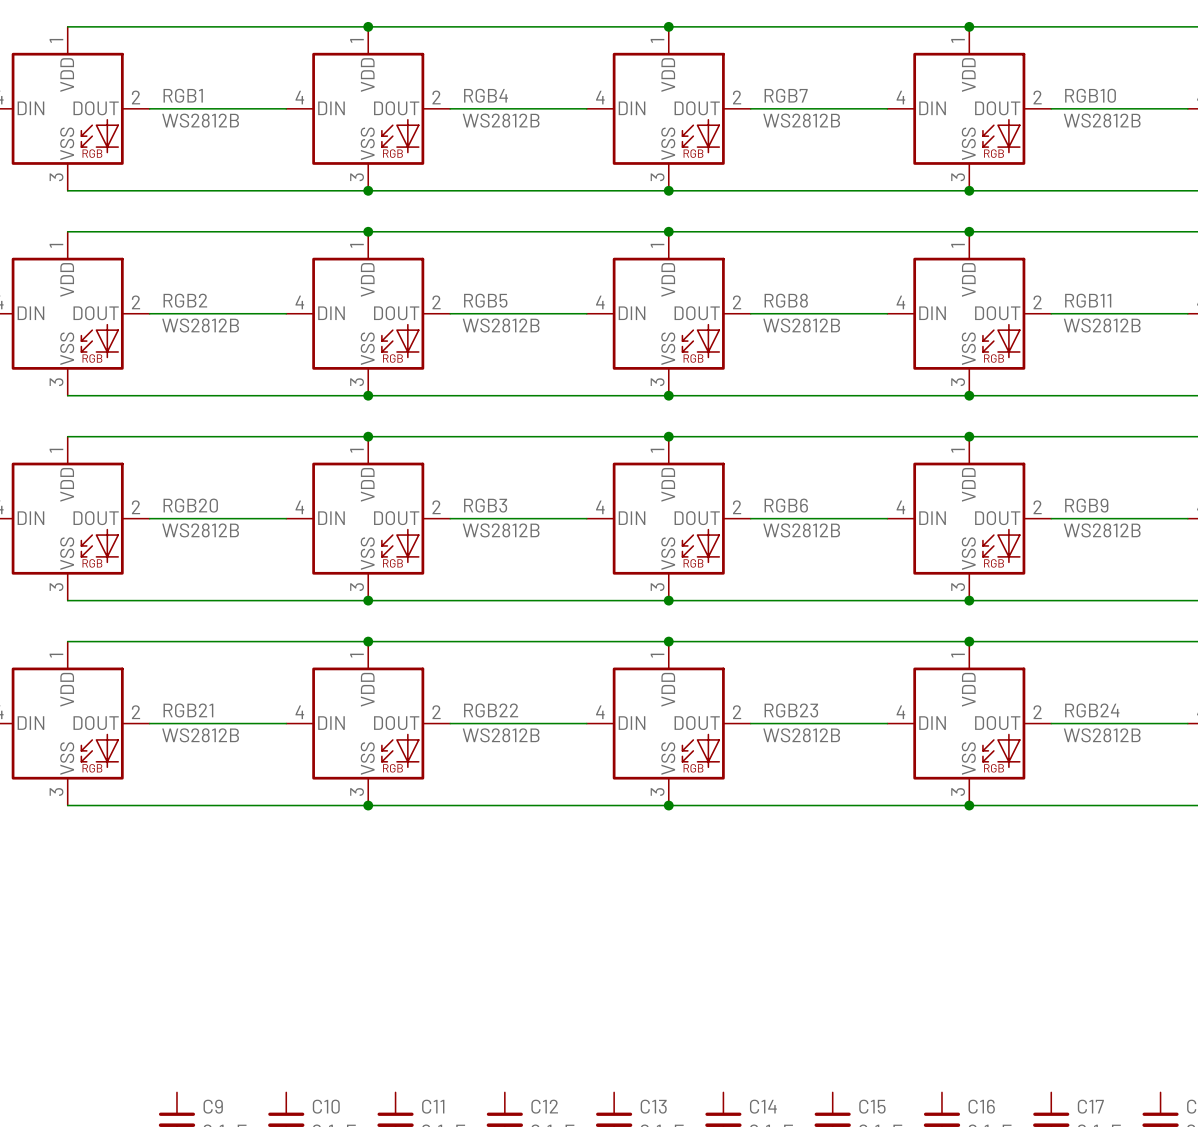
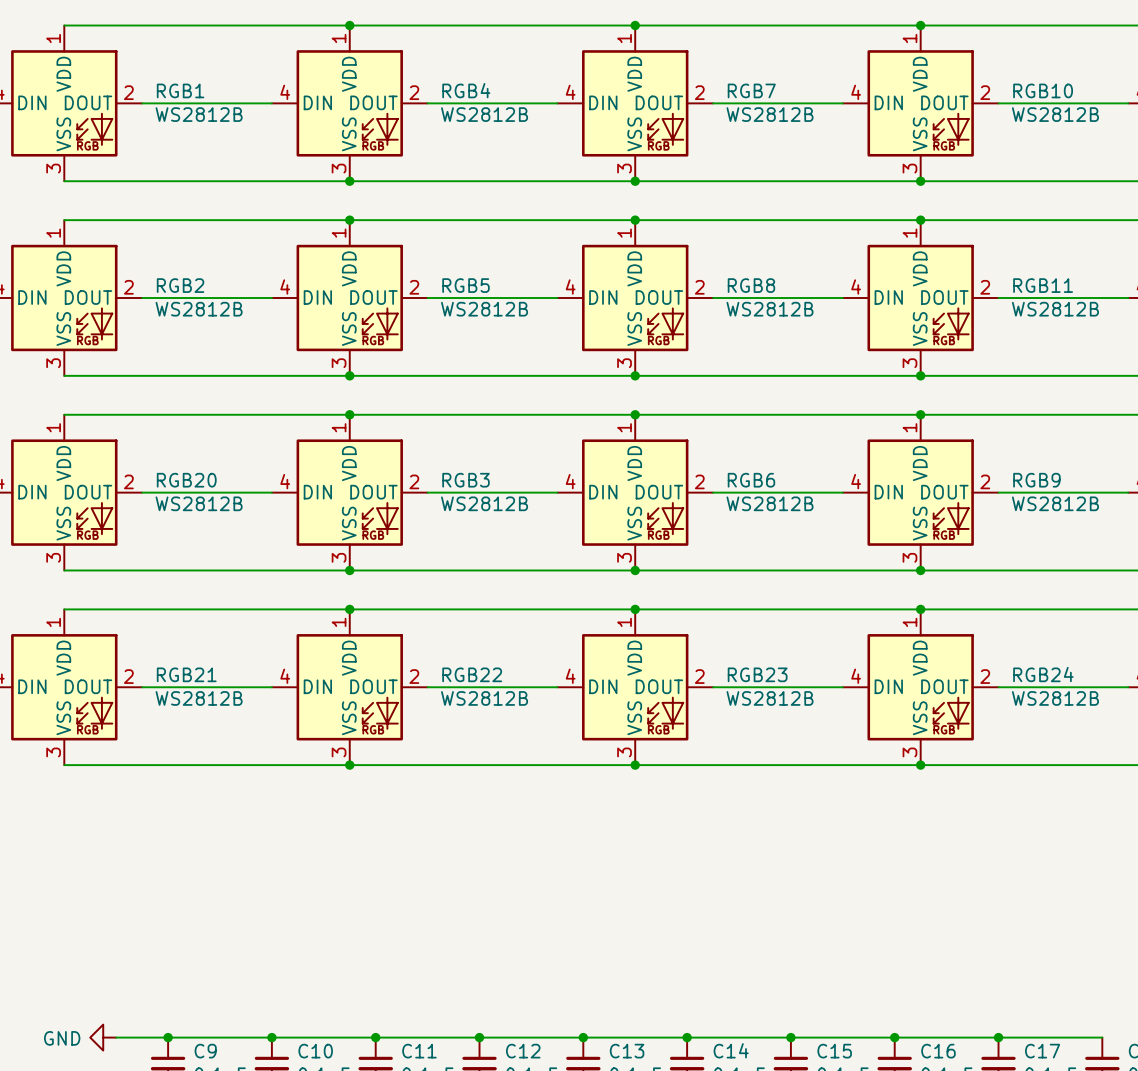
power symbol: none -> GND (103, 1037)
wire: none -> (116, 1037) (1102, 1037)
junction: none -> (168, 1037)
junction: none -> (271, 1037)
junction: none -> (375, 1037)
junction: none -> (479, 1037)
junction: none -> (583, 1037)
junction: none -> (687, 1037)
junction: none -> (790, 1037)
junction: none -> (894, 1037)
junction: none -> (998, 1037)

